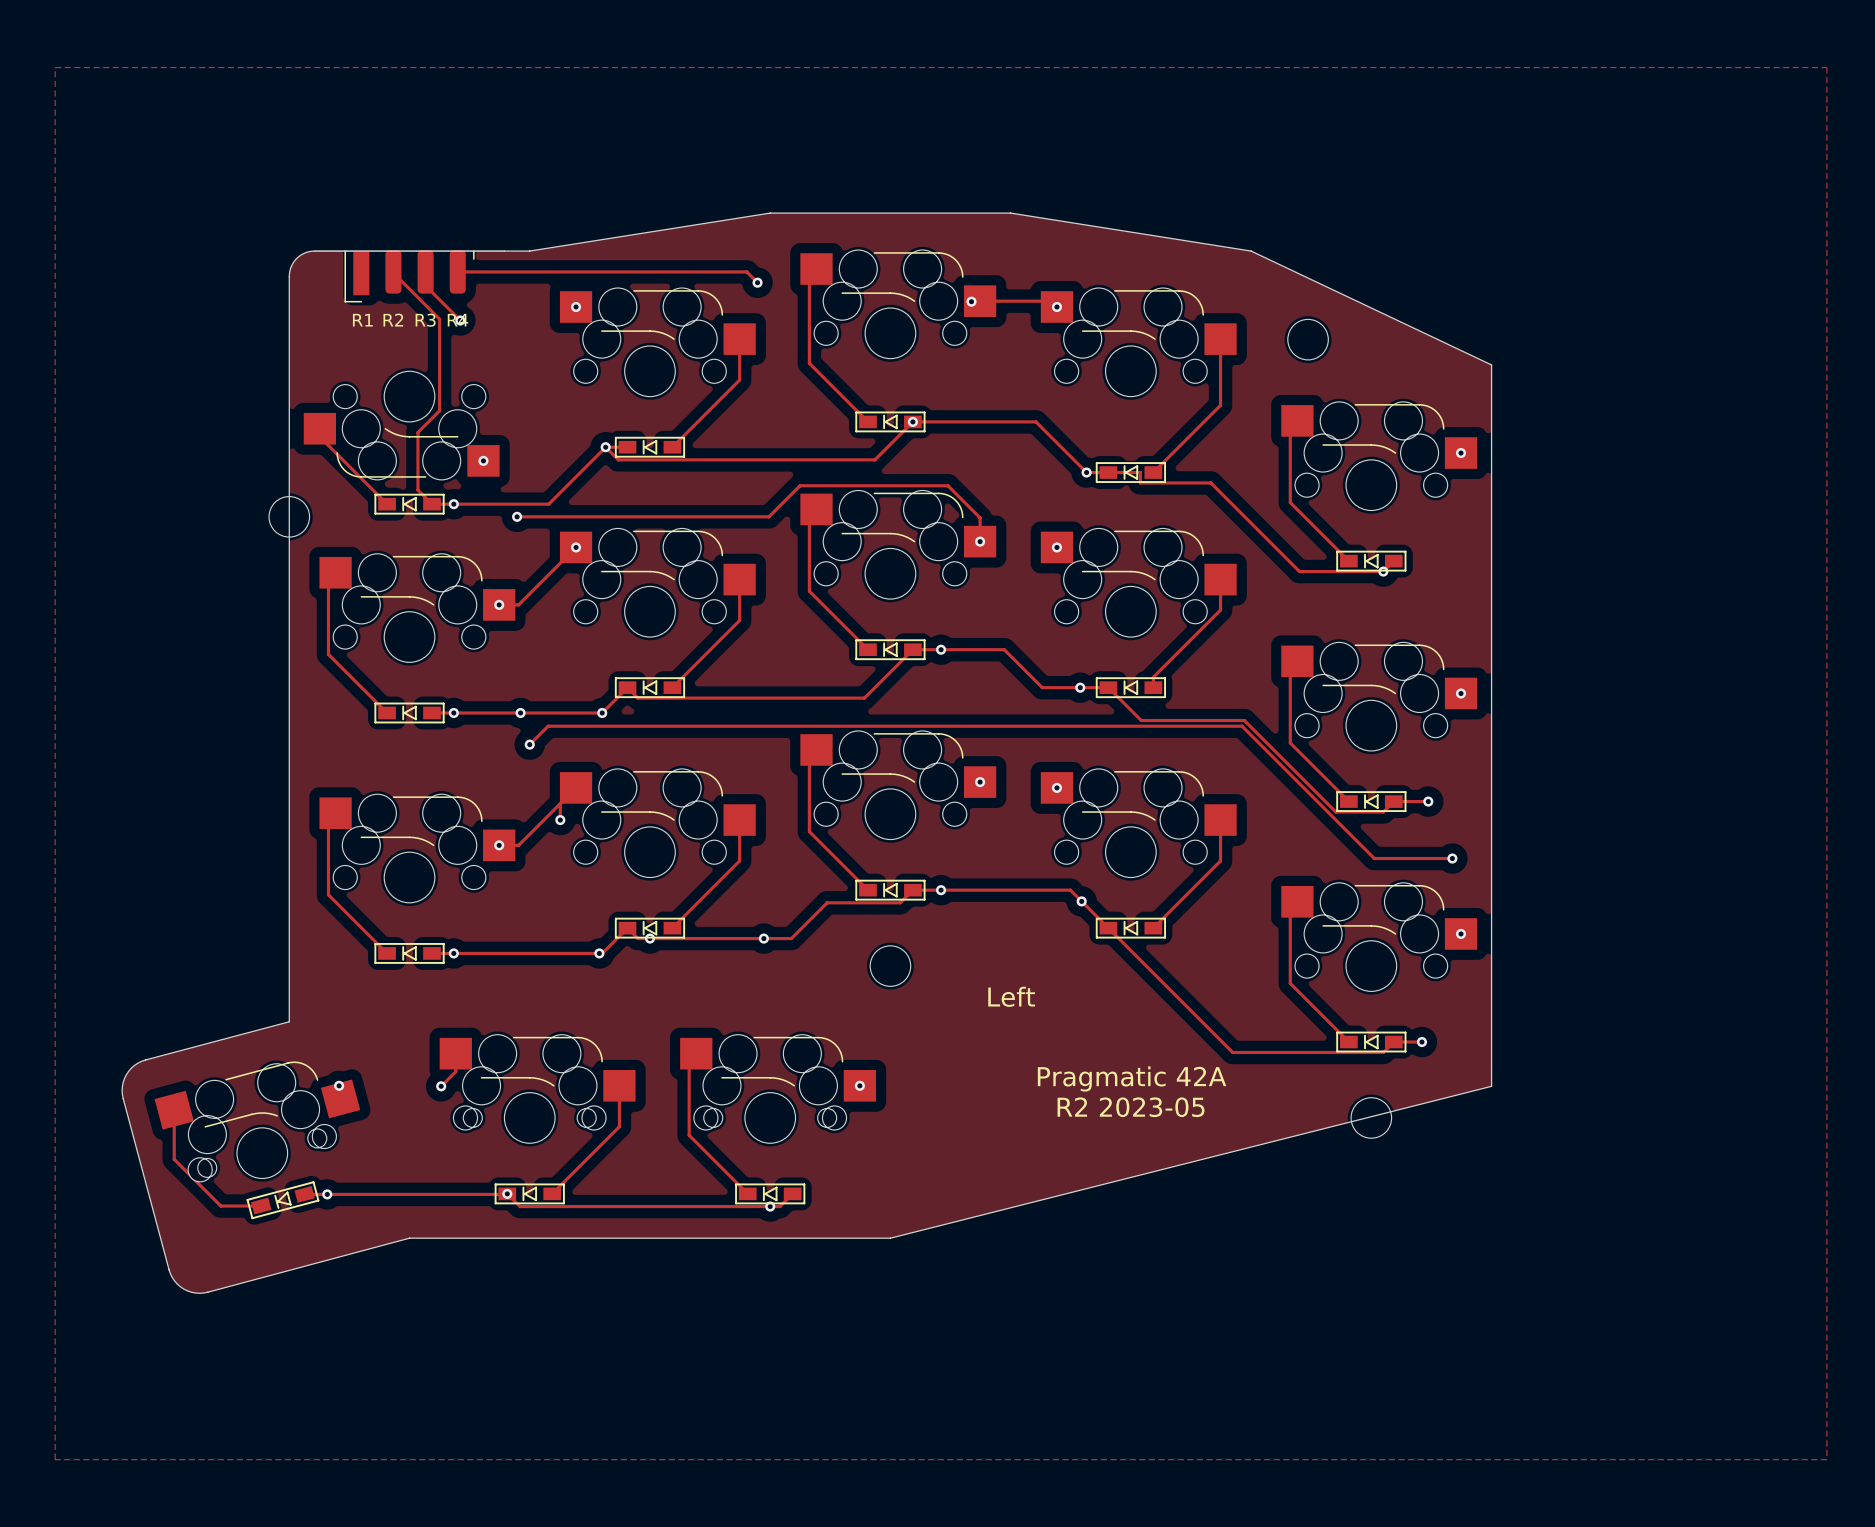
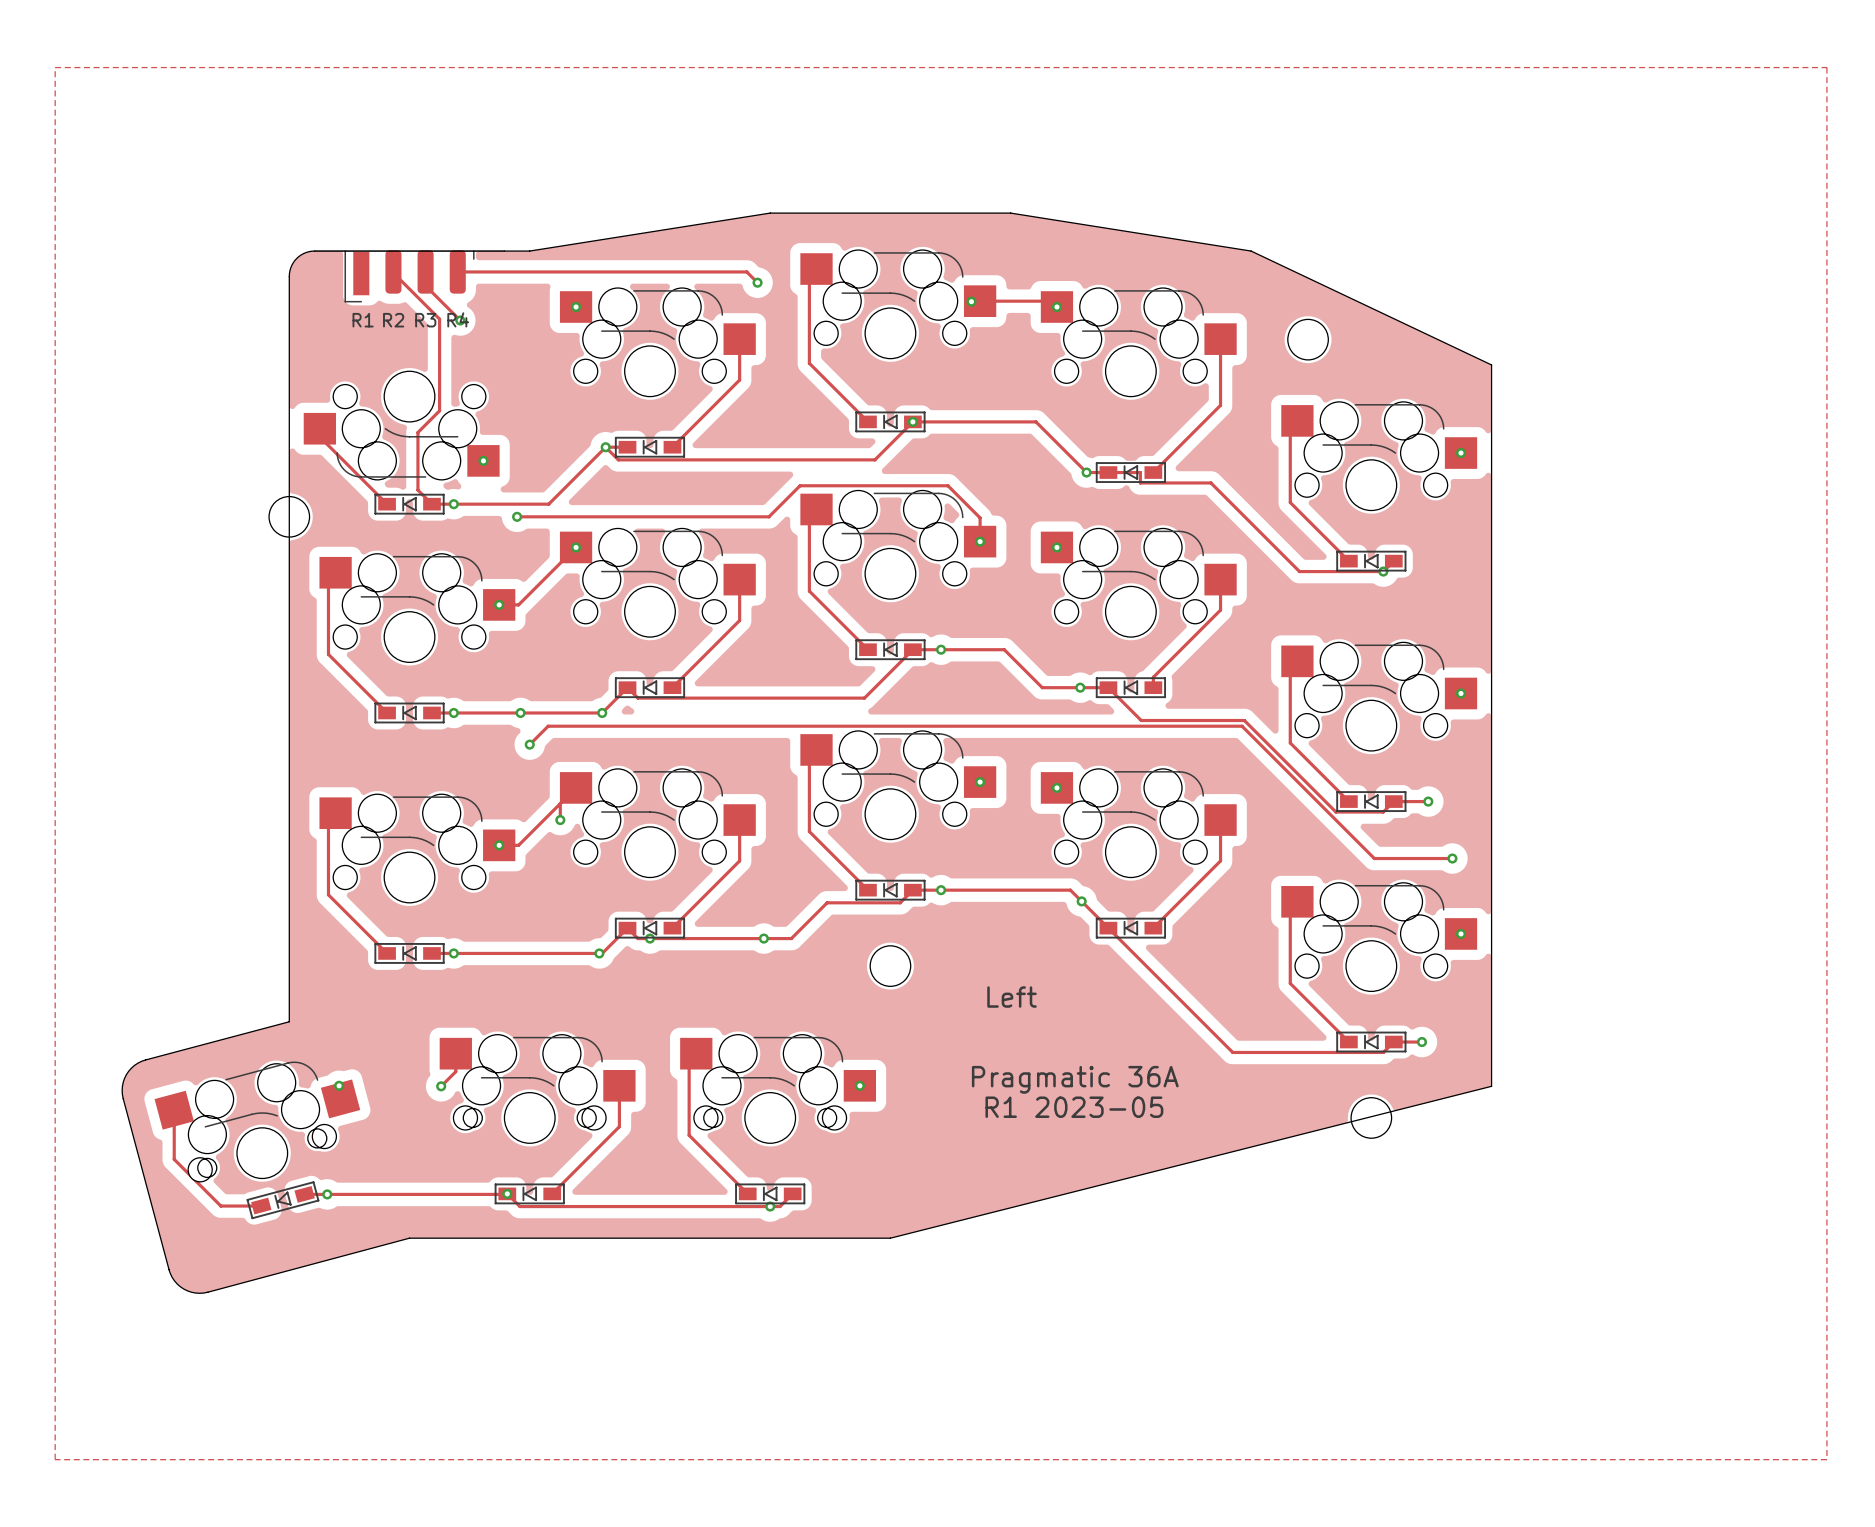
text: Pragmatic 42A (1132, 1078) -> Pragmatic 36A (1075, 1079)
text: R2 2023-05 (1131, 1107) -> R1 2023-05 (1074, 1107)

